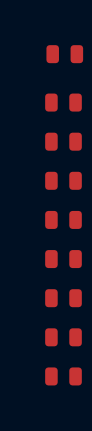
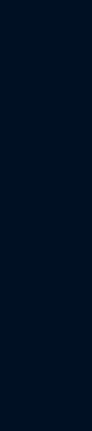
part: (64, 54) -> none
part: (63, 102) -> none
part: (63, 141) -> none
part: (63, 180) -> none
part: (63, 219) -> none
part: (63, 259) -> none
part: (63, 298) -> none
part: (63, 337) -> none
part: (63, 376) -> none

